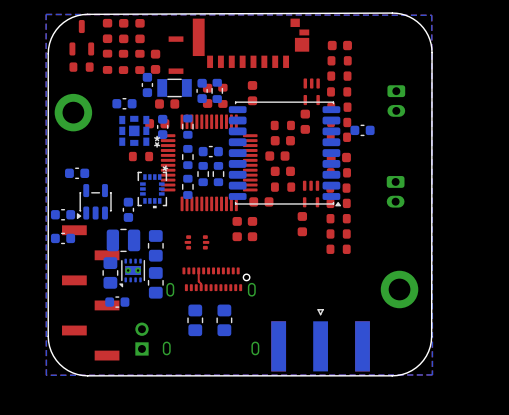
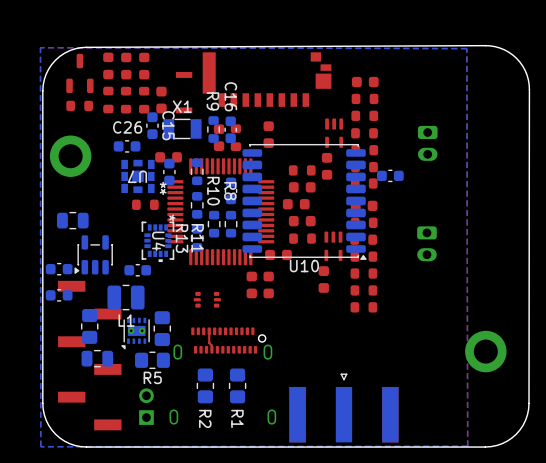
board edge: (48, 53) (49, 43) (56, 29) (67, 19) (82, 14) (392, 13) (405, 15) (420, 24) (428, 35) (432, 52) (431, 336) (428, 351) (416, 367) (407, 372) (392, 375) (82, 375) (67, 370) (56, 360) (49, 346) (48, 336) -> (42, 91) (44, 79) (51, 64) (64, 53) (80, 47) (485, 45) (500, 48) (516, 58) (526, 74) (529, 89) (529, 403) (523, 425) (507, 441) (485, 447) (80, 446) (69, 443) (55, 434) (46, 420) (42, 403)
X1 name: none -> X1 (182, 106)
C15 name: none -> C15 (168, 125)
C26 name: none -> C26 (127, 127)
R9: none -> (213, 129)
C16: none -> (230, 129)
part: (202, 90) -> none
part: (217, 90) -> none
part: (167, 103) -> none
part: none -> (168, 157)
part: (157, 123) -> none
U7 name: none -> U7 (137, 176)
R10 name: none -> R10 (213, 191)
R8 name: none -> R8 (230, 191)
part rotation: 0° (210, 151) -> 90° clockwise (231, 190)
part footprint: [65, 167, 90, 179] -> [56, 211, 89, 230]
R11 name: none -> R11 (197, 238)
R13 name: none -> R13 (182, 238)
U4 name: none -> U4 (158, 241)
part rotation: 0° (128, 209) -> 90° clockwise (137, 270)
U10 name: none -> U10 (304, 266)
part: (155, 245) -> none
L1 name: none -> L1 (126, 320)
part: none -> (162, 328)
part position: (110, 272) -> (89, 326)
part: (155, 282) -> none
part position: (399, 289) -> (485, 351)
part: none -> (97, 358)
R5: none -> (152, 360)
part: (117, 302) -> none
R2 name: none -> R2 (205, 418)
R1 name: none -> R1 (237, 418)

